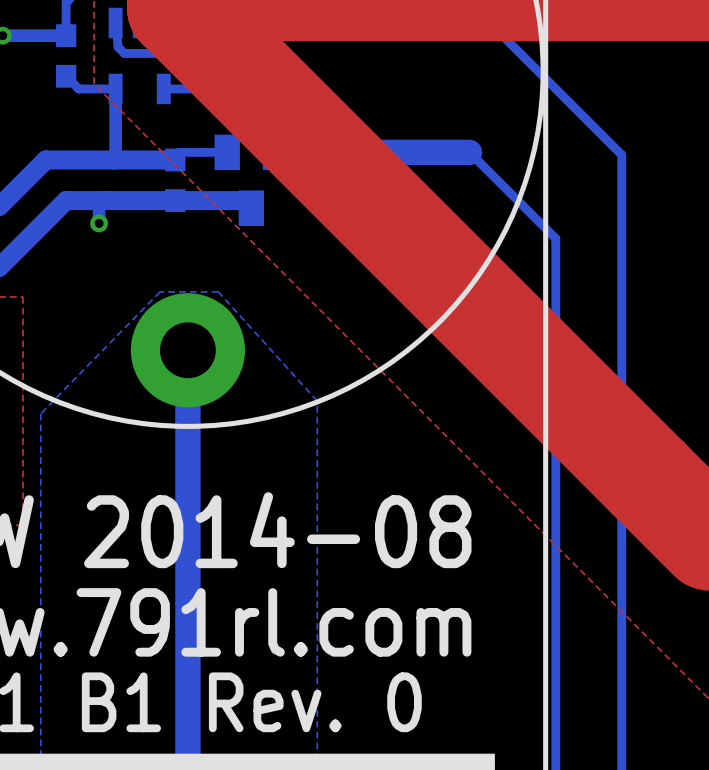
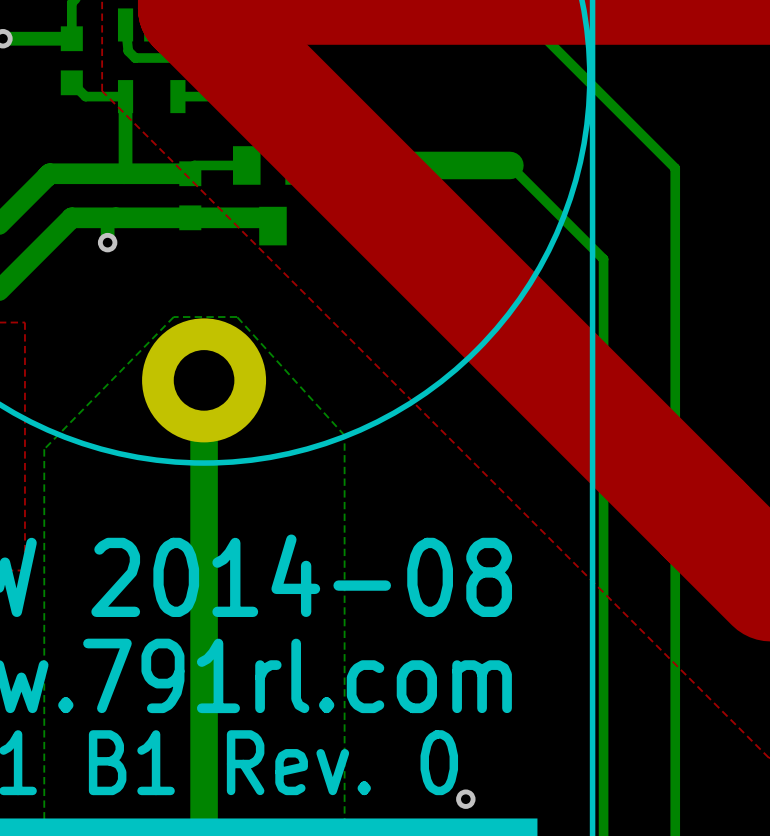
via: none -> (465, 799)

